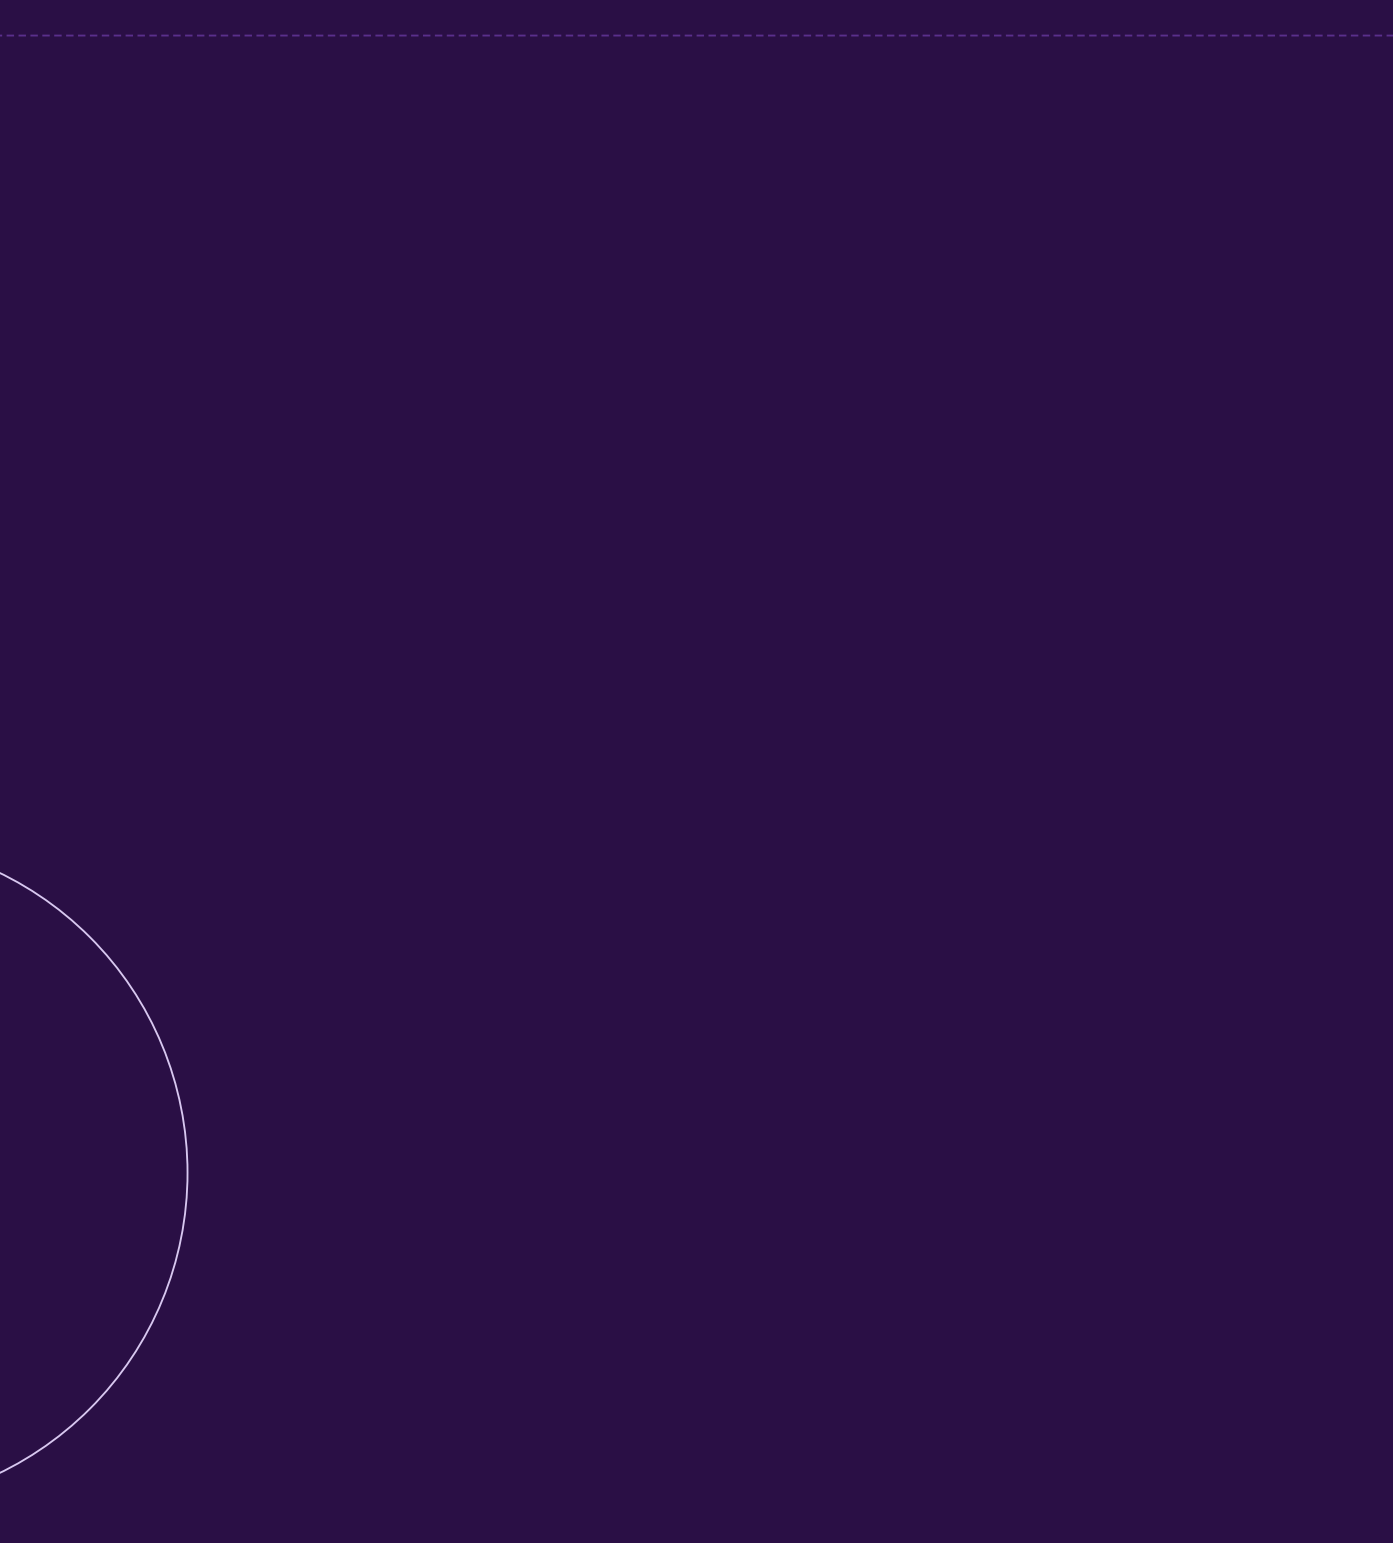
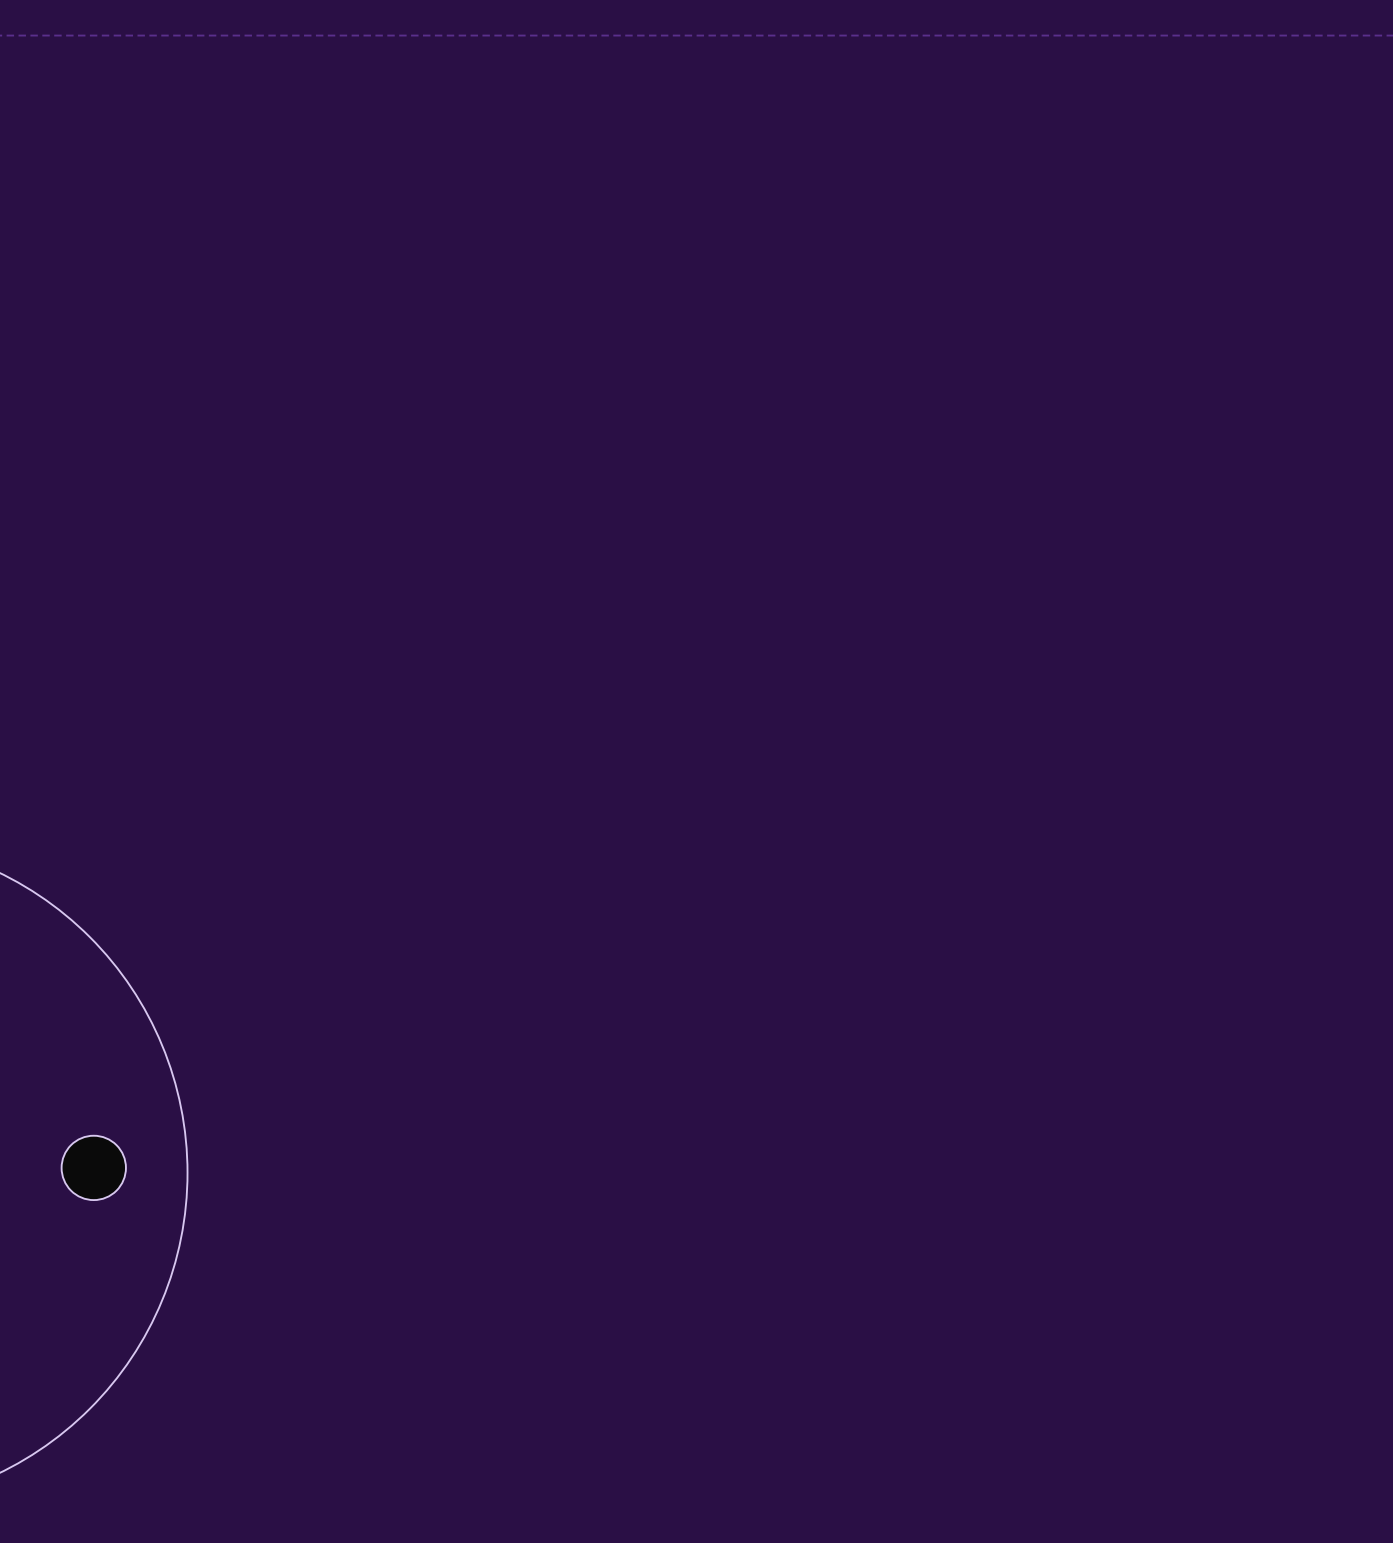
part: none -> (93, 1167)

